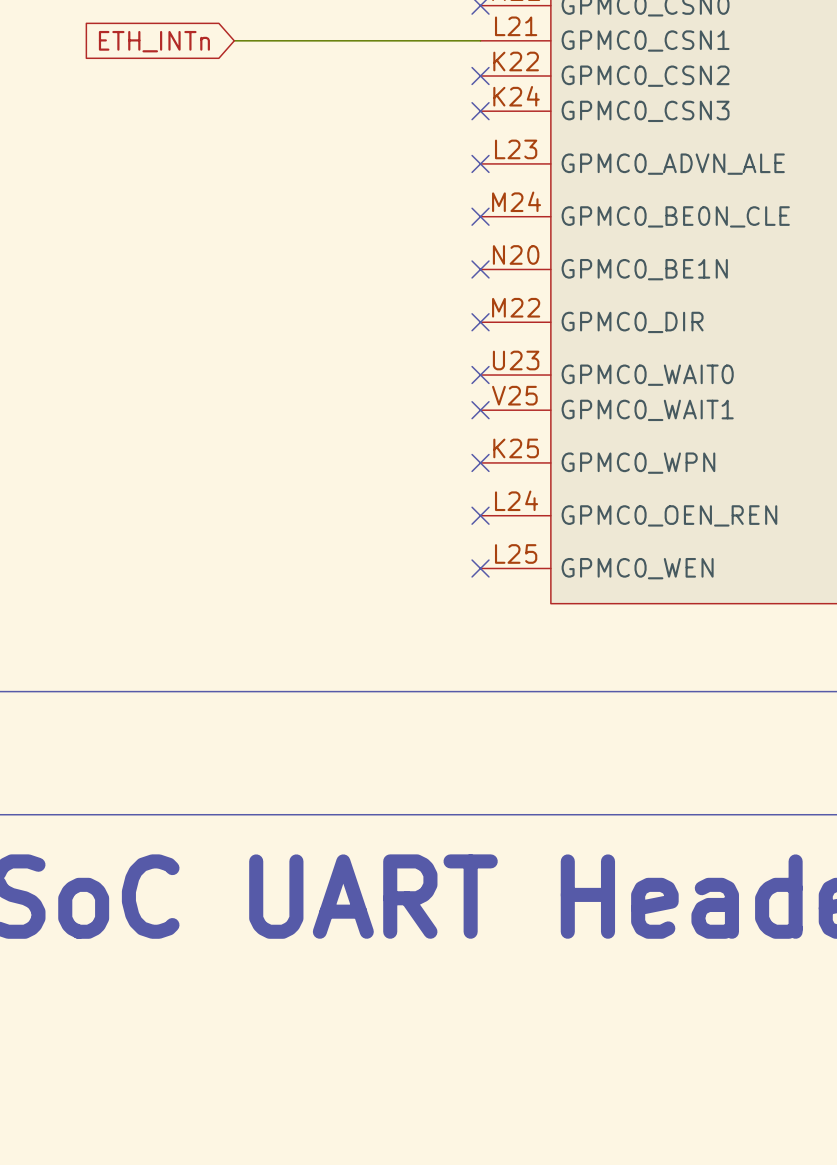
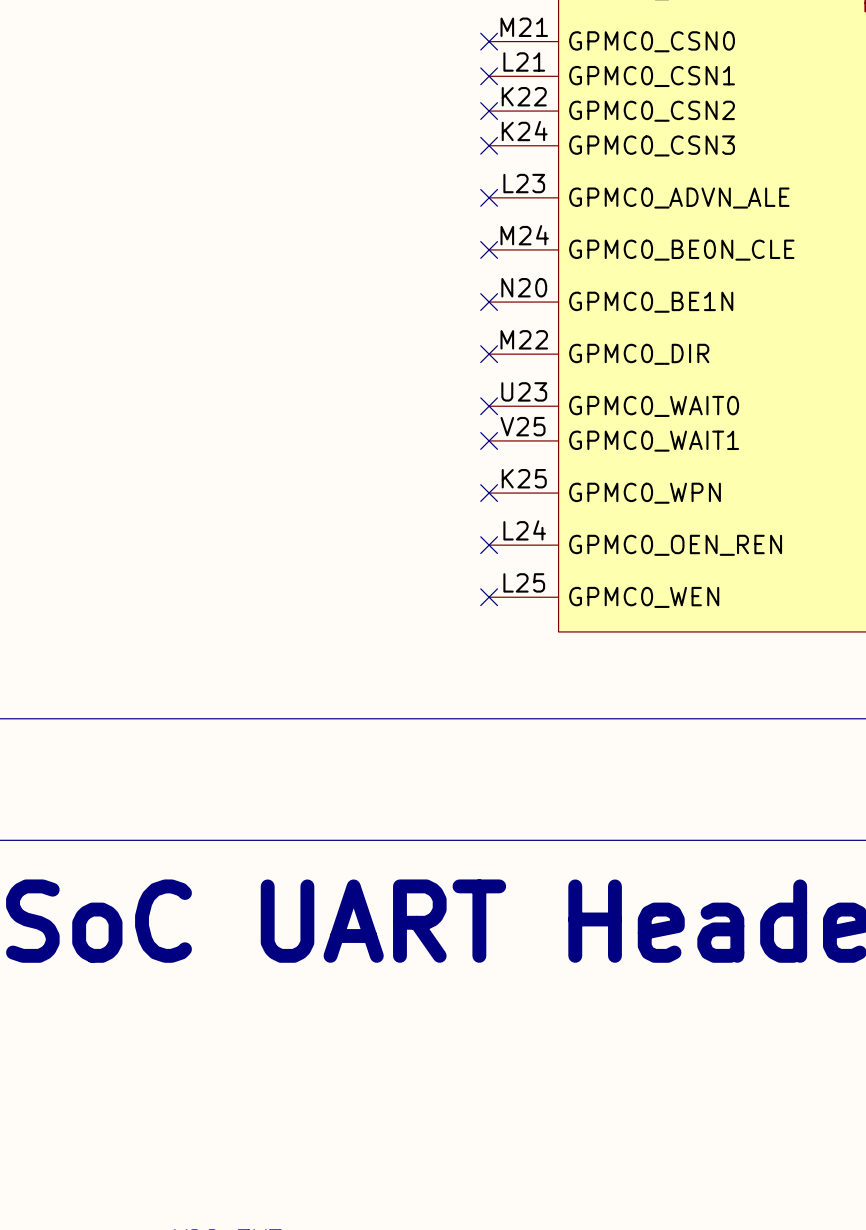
wire: (234, 40) (480, 40) -> none
no-connect mark: none -> (489, 76)
global label: ETH_INTn (154, 41) -> none

